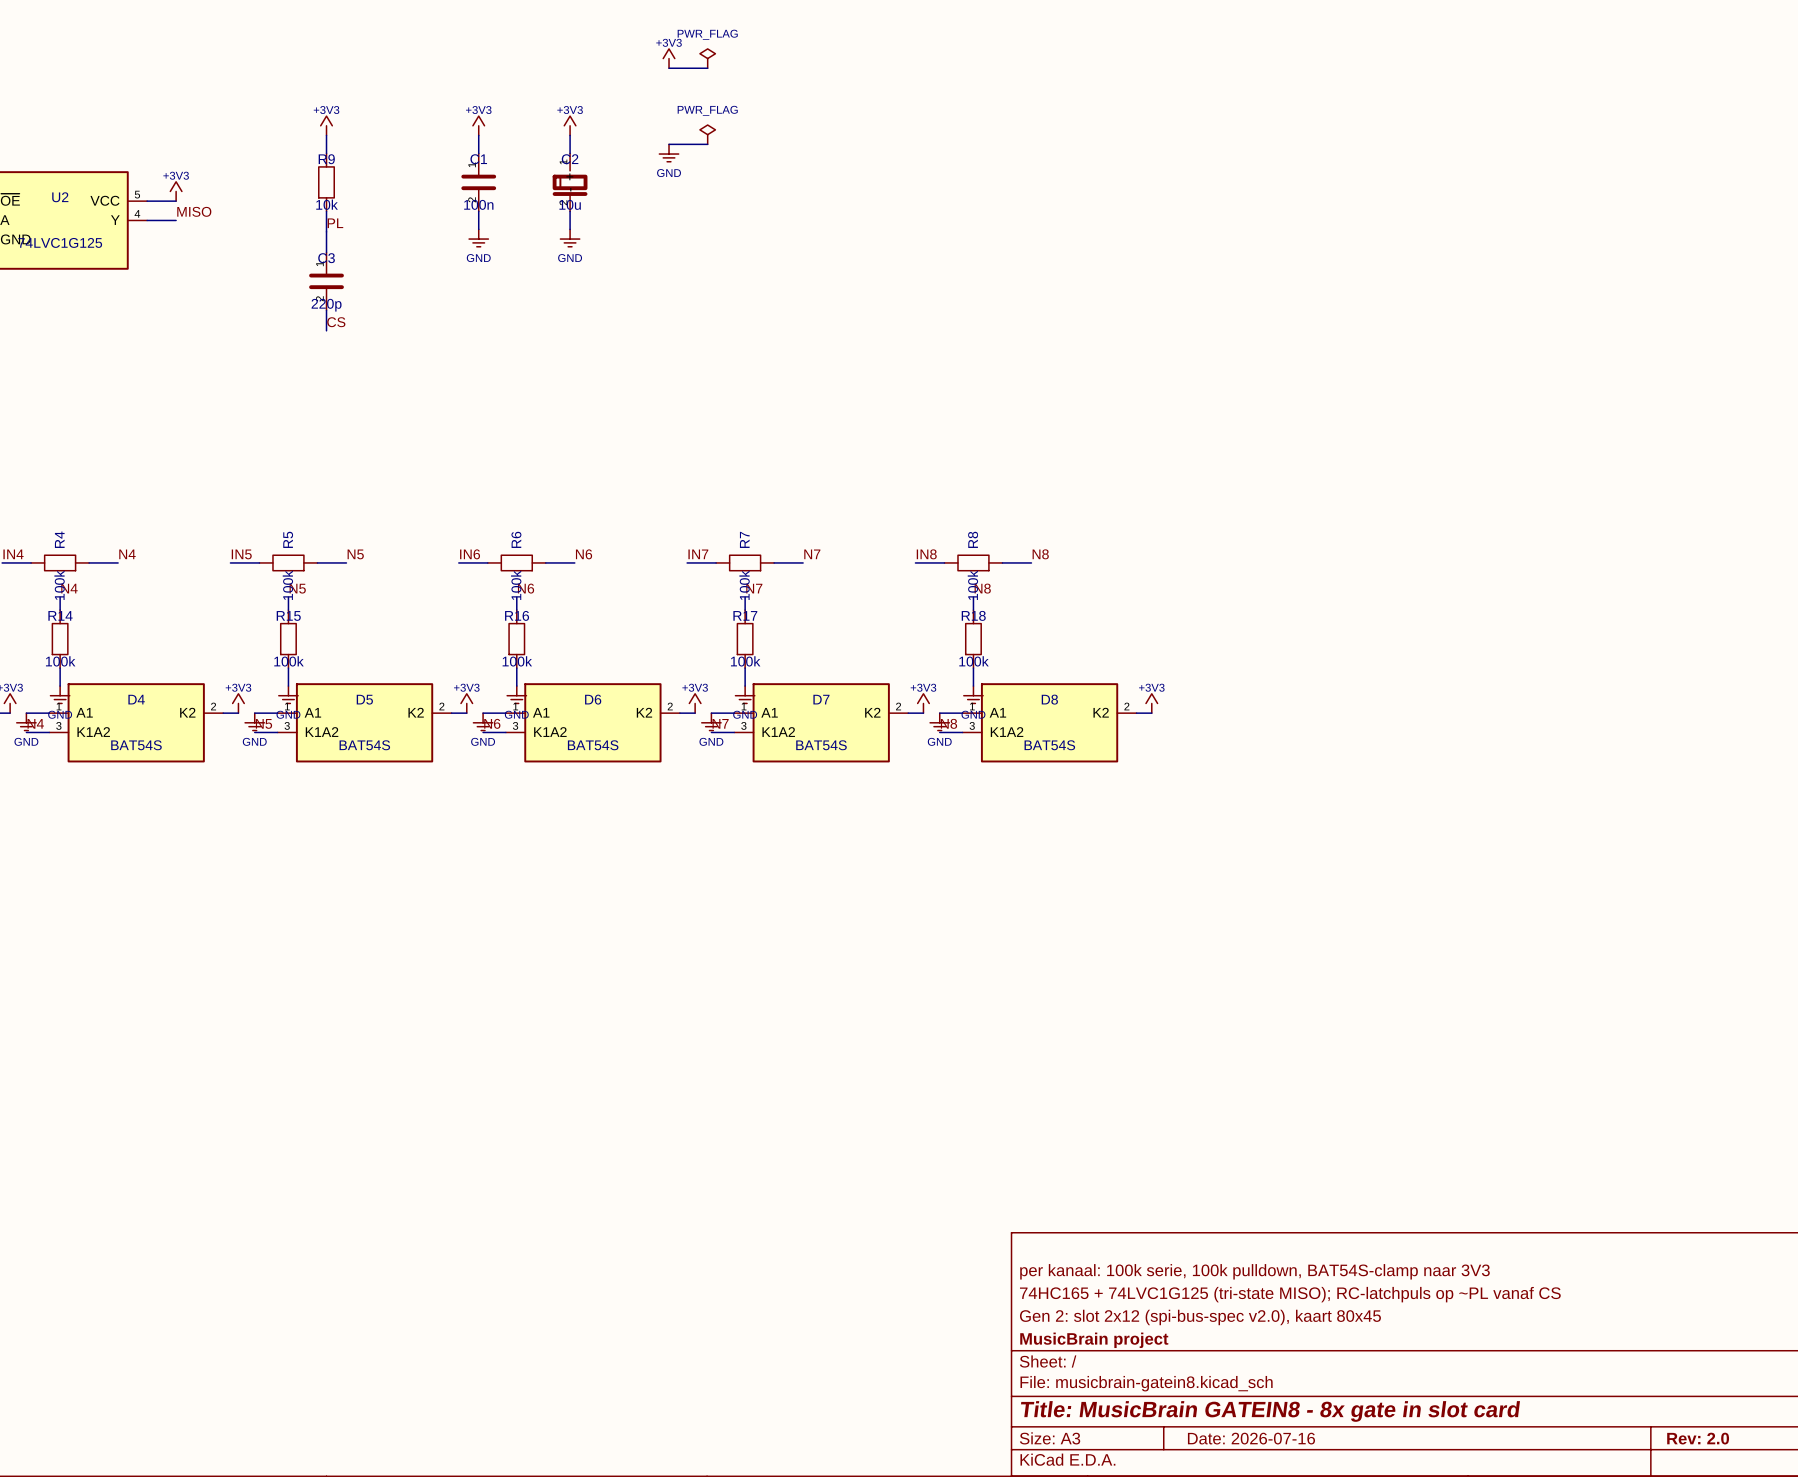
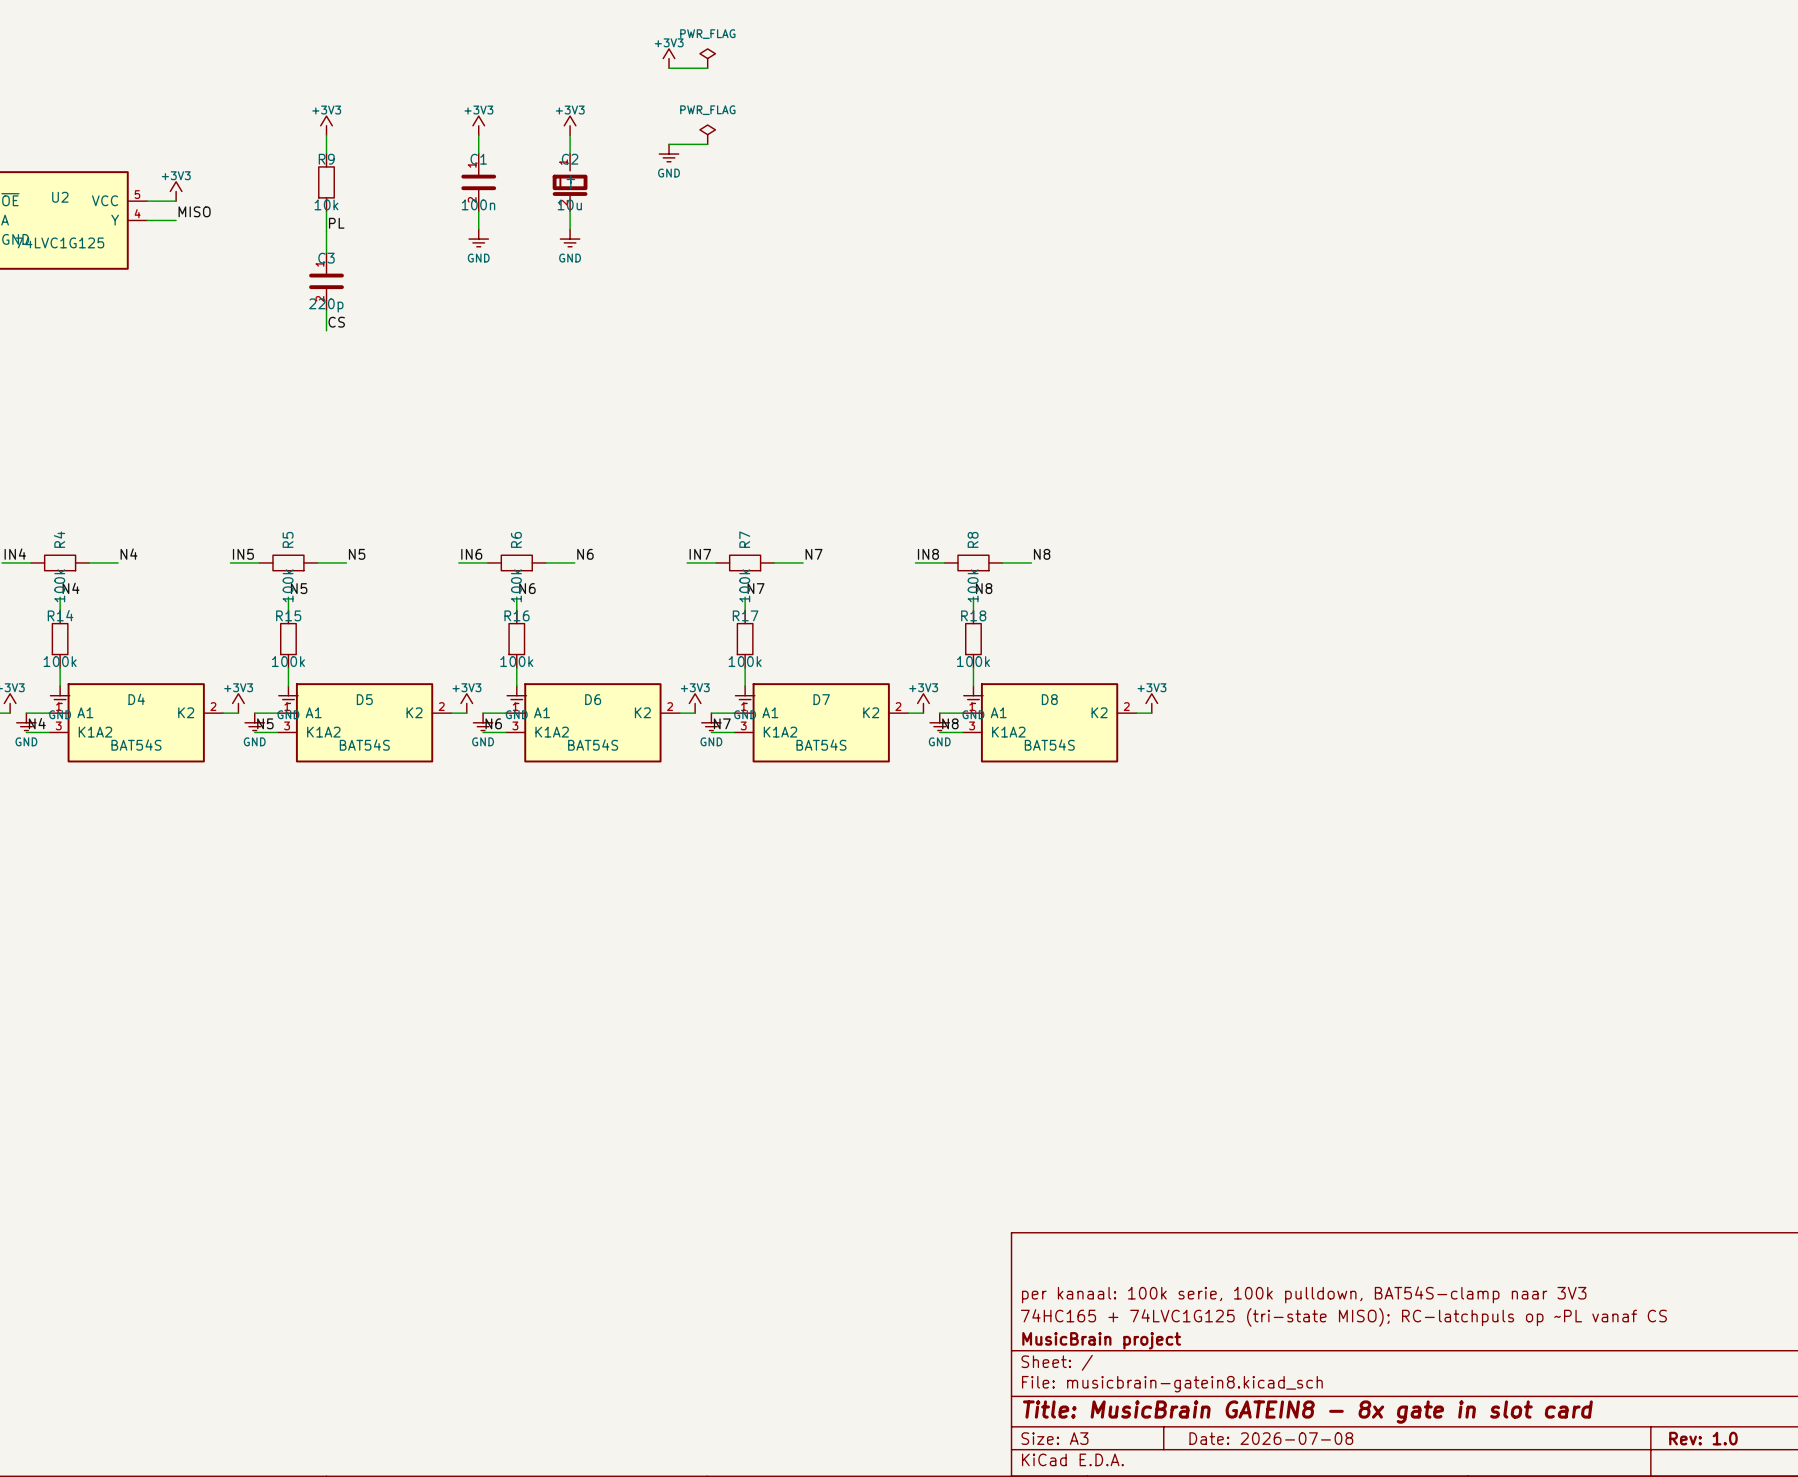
title block: per kanaal: 100k serie, 100k pulldown, BAT54S-clamp naar 3V3 (1254, 1271) -> none
title block: 74HC165 + 74LVC1G125 (tri-state MISO); RC-latchpuls op ~PL vanaf CS (1290, 1294) -> per kanaal: 100k serie, 100k pulldown, BAT54S-clamp naar 3V3 (1304, 1294)
title block: Gen 2: slot 2x12 (spi-bus-spec v2.0), kaart 80x45 (1200, 1317) -> 74HC165 + 74LVC1G125 (tri-state MISO); RC-latchpuls op ~PL vanaf CS (1343, 1317)
title block: Date: 2026-07-16 (1251, 1438) -> Date: 2026-07-08 (1271, 1438)
title block: Rev: 2.0 (1698, 1438) -> Rev: 1.0 (1703, 1438)

